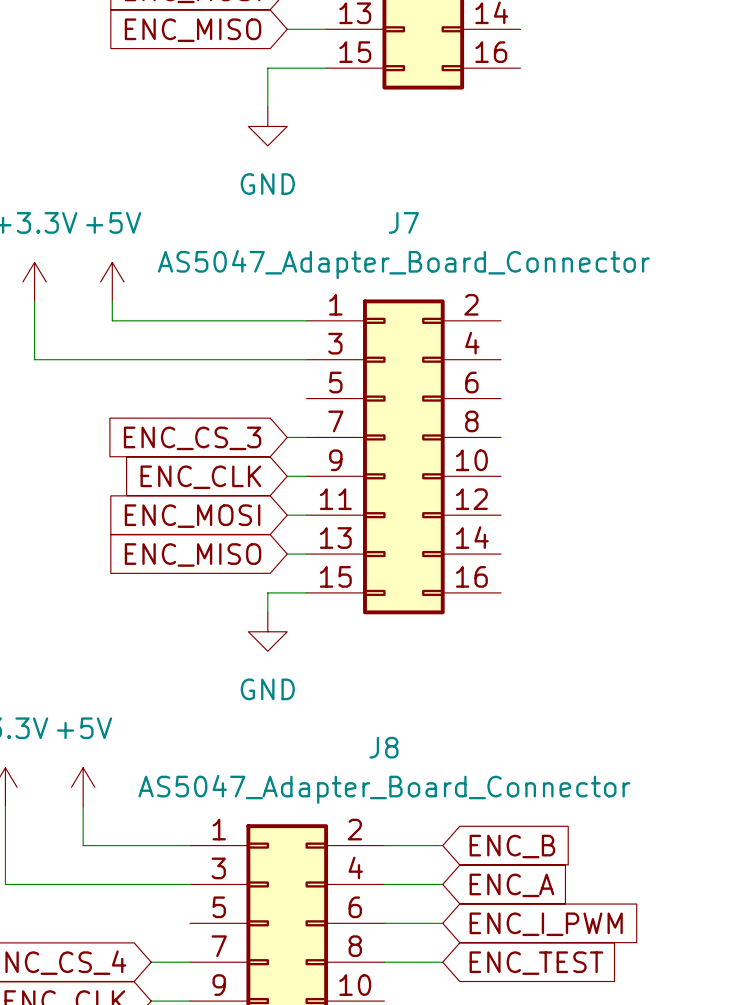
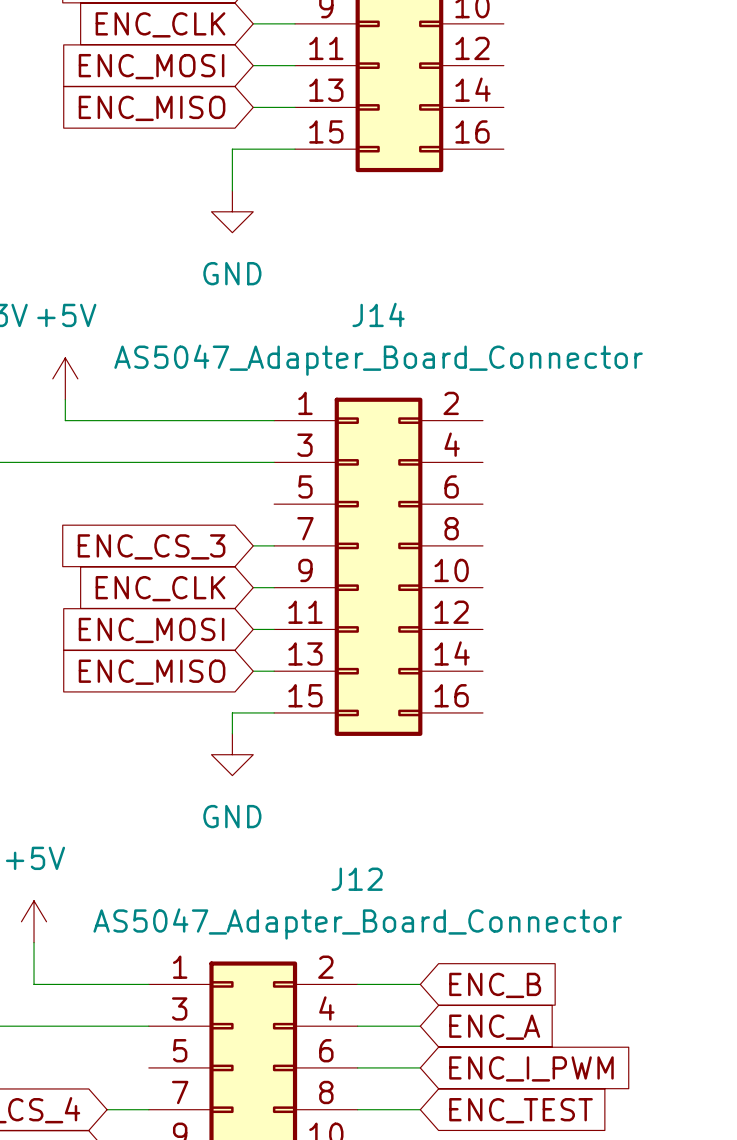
J7 name: J7 (403, 222) -> J14 (378, 314)
J8 name: J8 (383, 747) -> J12 (357, 879)

